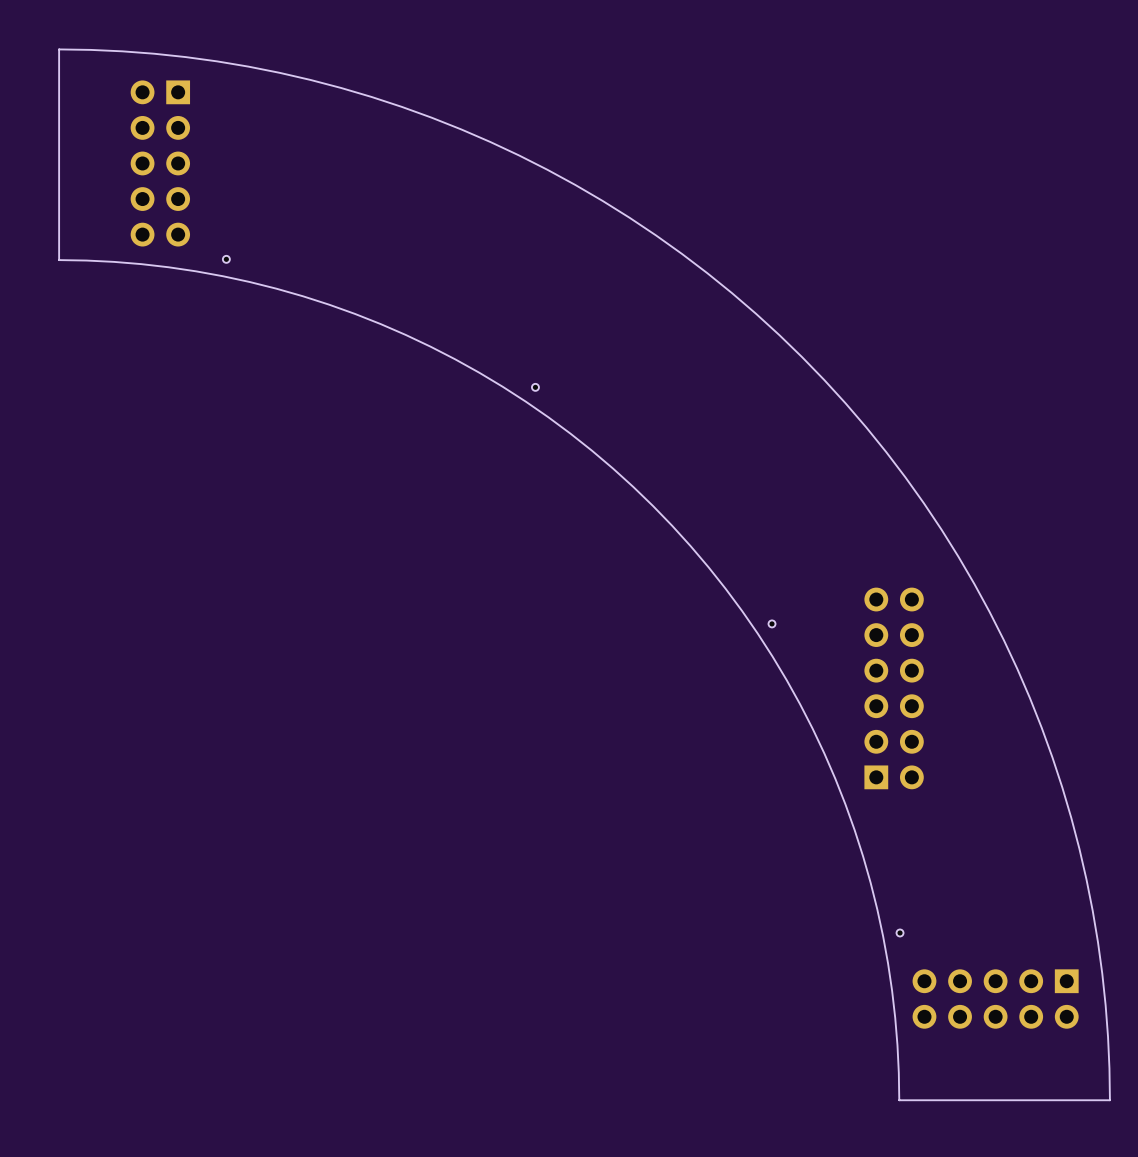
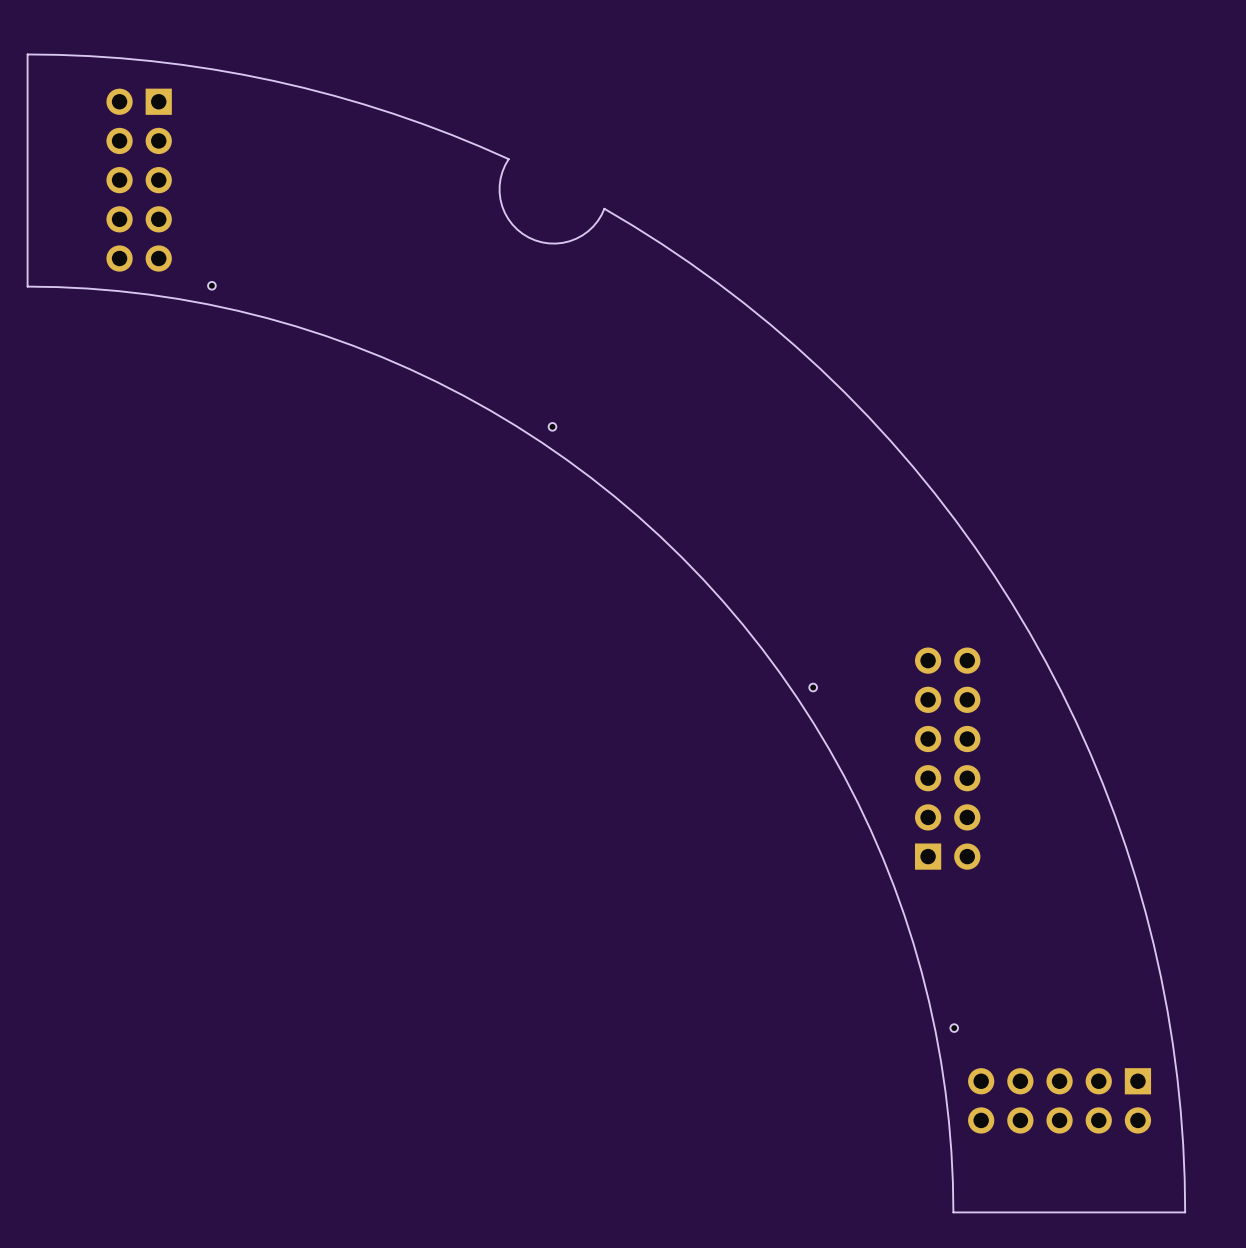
board edge: (59, 49) (154, 53) (217, 61) (279, 72) (371, 97) (461, 129) (547, 169) (602, 200) (656, 235) (731, 293) (802, 357) (866, 427) (923, 503) (958, 556) (989, 611) (1029, 698) (1062, 787) (1079, 848) (1092, 910) (1105, 1005) (1109, 1100) -> (27, 54) (120, 58) (182, 64) (243, 74) (304, 87) (363, 104) (422, 123) (480, 146) (508, 159) (500, 178) (500, 199) (508, 218) (522, 233) (541, 242) (555, 243) (569, 241) (582, 235) (593, 226) (604, 208) (689, 262) (744, 303) (795, 346) (844, 392) (913, 467) (975, 547) (1029, 632) (1061, 691) (1090, 753) (1126, 847) (1145, 912) (1161, 977) (1177, 1077) (1183, 1144) (1185, 1212)

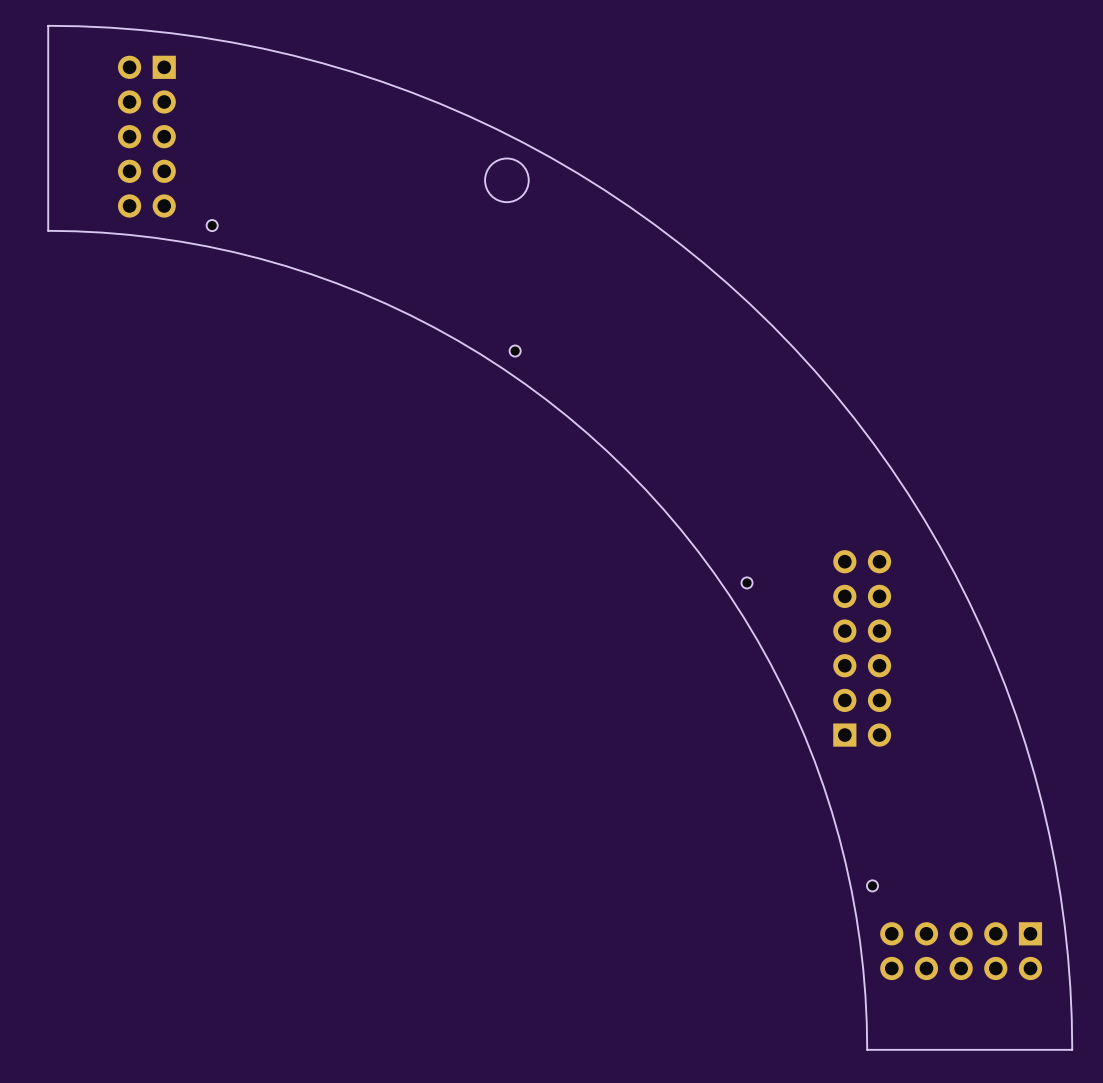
board edge: (27, 54) (120, 58) (182, 64) (243, 74) (304, 87) (363, 104) (422, 123) (480, 146) (508, 159) (500, 178) (500, 199) (508, 218) (522, 233) (541, 242) (555, 243) (569, 241) (582, 235) (593, 226) (604, 208) (689, 262) (744, 303) (795, 346) (844, 392) (913, 467) (975, 547) (1029, 632) (1061, 691) (1090, 753) (1126, 847) (1145, 912) (1161, 977) (1177, 1077) (1183, 1144) (1185, 1212) -> (48, 25) (140, 30) (232, 42) (323, 63) (382, 81) (440, 103) (524, 143) (577, 173) (629, 207) (703, 263) (772, 325) (834, 394) (890, 468) (924, 520) (954, 573) (994, 657) (1025, 745) (1049, 834) (1064, 926) (1070, 988) (1072, 1049)
round board edge: none -> [484, 158, 530, 203]
part footprint: [208, 281, 216, 290] -> [206, 220, 218, 232]
part footprint: [548, 422, 557, 431] -> [509, 345, 521, 357]
part footprint: [809, 683, 818, 692] -> [741, 577, 753, 589]
part footprint: [950, 1024, 959, 1032] -> [866, 880, 879, 892]

